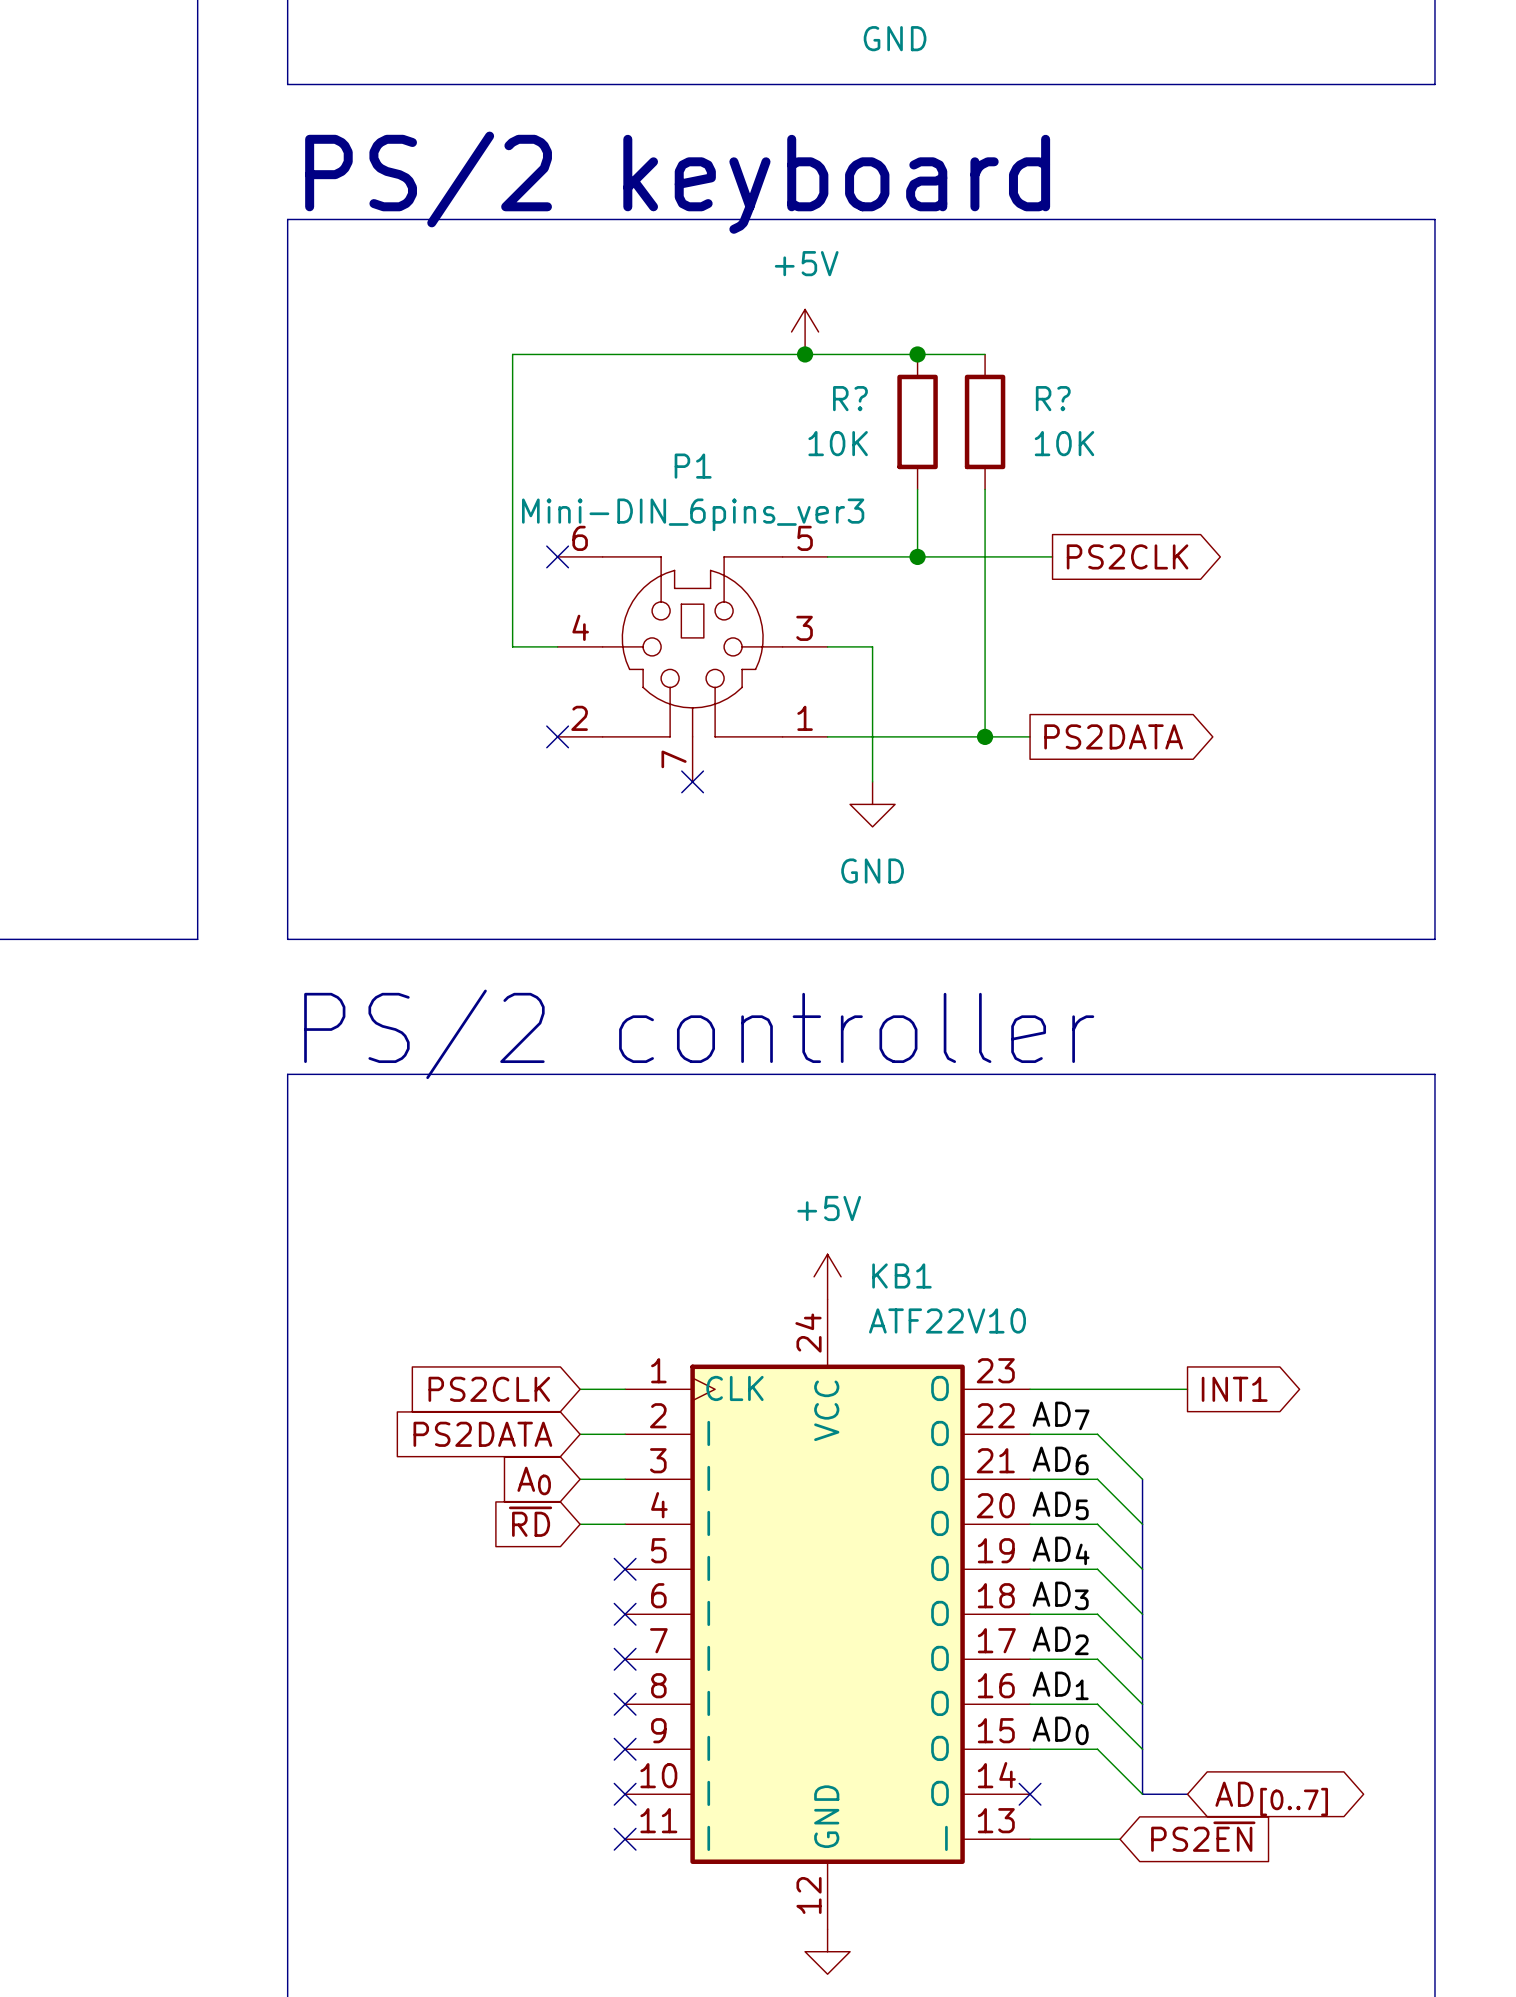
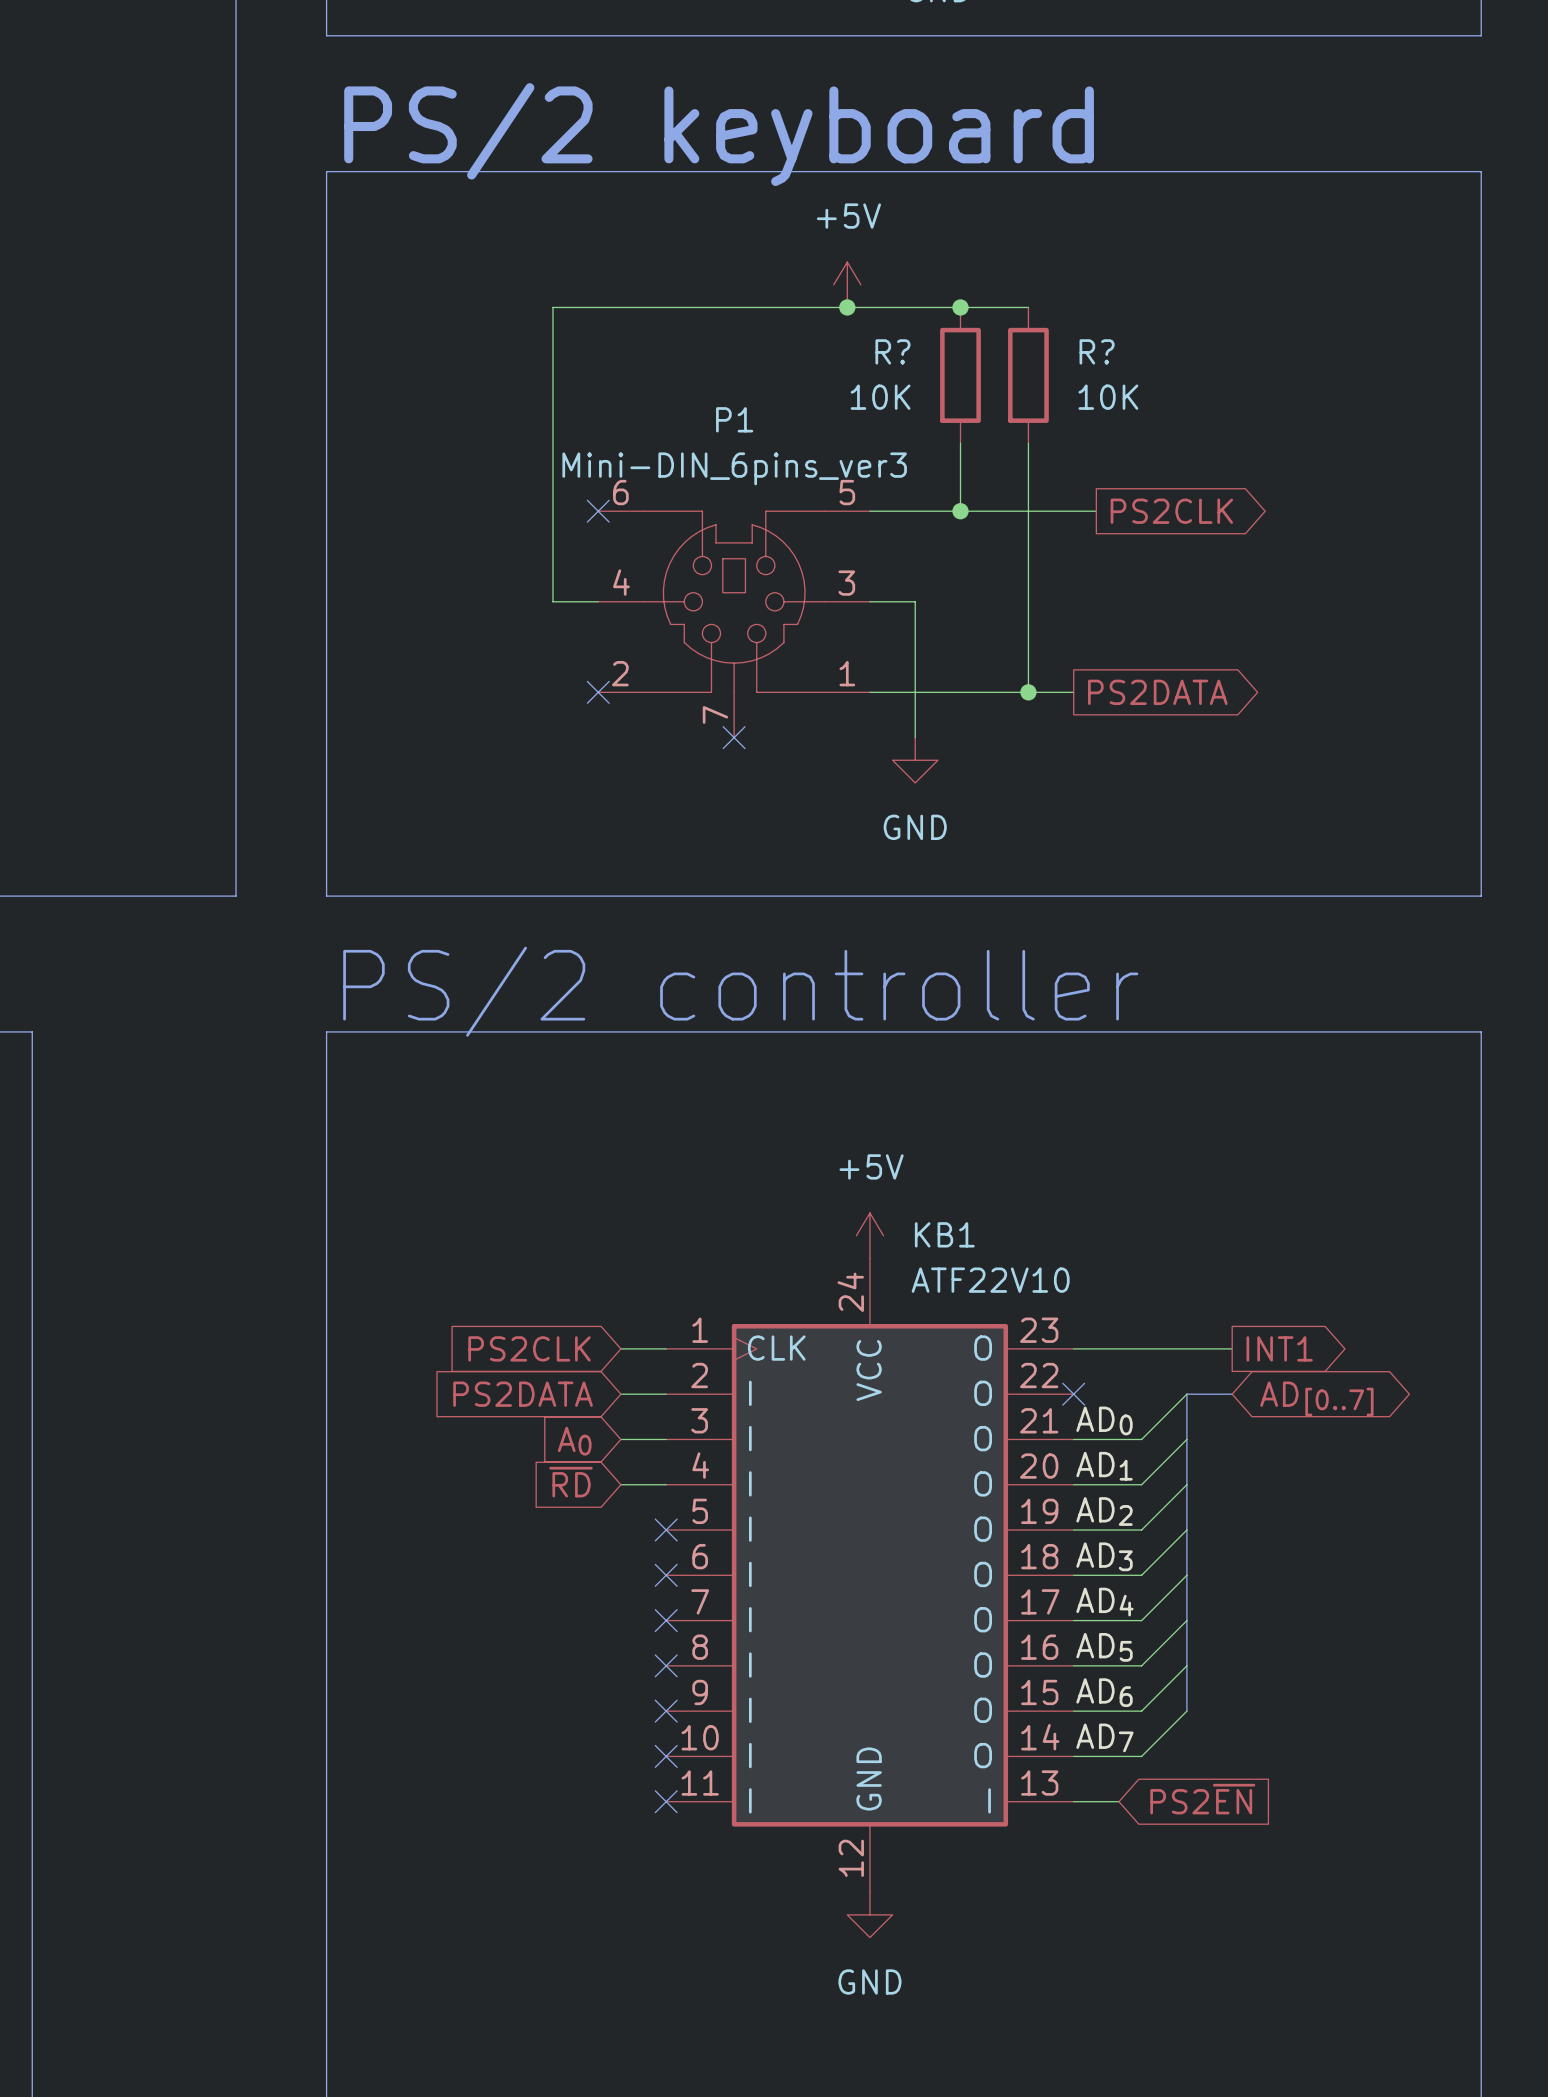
label position: AD7 (1061, 1415) -> AD7 (1104, 1737)
wire: (1030, 1434) (1097, 1434) (1142, 1479) -> none
no-connect mark: none -> (1073, 1394)
bus: none -> (1232, 1394) (1186, 1394) (1186, 1439)
label: AD6 (1060, 1460) -> AD0 (1104, 1420)
wire: (1097, 1479) (1142, 1524) -> (1141, 1439) (1186, 1394)
label: AD5 (1060, 1505) -> AD1 (1104, 1466)
wire: (1097, 1524) (1142, 1569) -> (1141, 1484) (1186, 1439)
label: AD4 (1061, 1550) -> AD2 (1104, 1511)
wire: (1097, 1569) (1142, 1614) -> (1141, 1530) (1186, 1484)
wire: (1097, 1614) (1142, 1659) -> (1141, 1575) (1186, 1530)
label: AD2 (1060, 1640) -> AD4 (1104, 1602)
wire: (1097, 1659) (1142, 1704) -> (1141, 1620) (1186, 1575)
label: AD1 (1060, 1685) -> AD5 (1104, 1647)
wire: (1097, 1704) (1142, 1749) -> (1141, 1665) (1186, 1620)
label: AD0 (1060, 1730) -> AD6 (1104, 1692)
wire: (1097, 1749) (1142, 1794) -> (1141, 1711) (1186, 1665)
wire: none -> (1186, 1711) (1141, 1756) (1073, 1756)
bus: (1142, 1749) (1142, 1794) (1187, 1794) -> none
no-connect mark: (1030, 1794) -> none
global label position: AD[0..7] (1271, 1798) -> AD[0..7] (1316, 1398)
global label position: PS2~{EN} (1203, 1836) -> PS2~{EN} (1202, 1799)
wire: (1075, 1839) (1120, 1839) -> none

